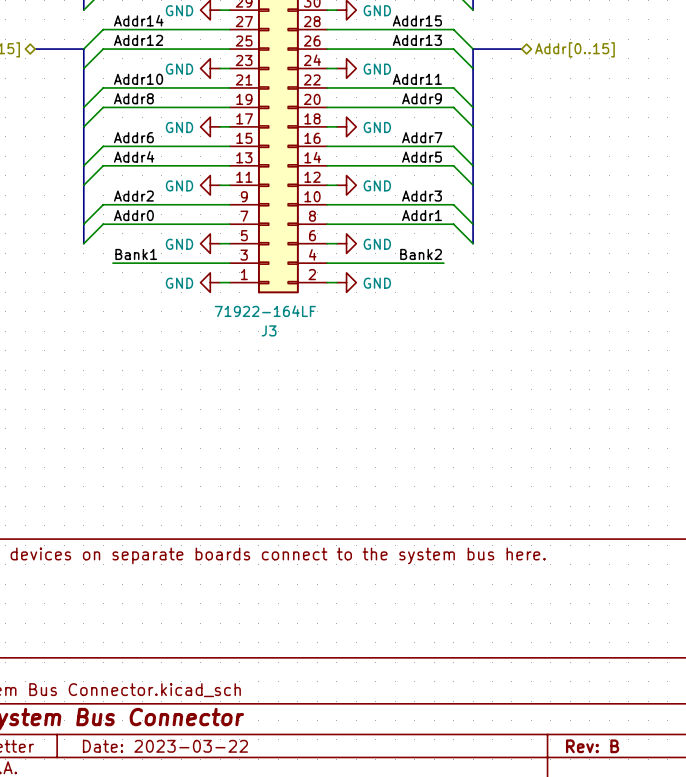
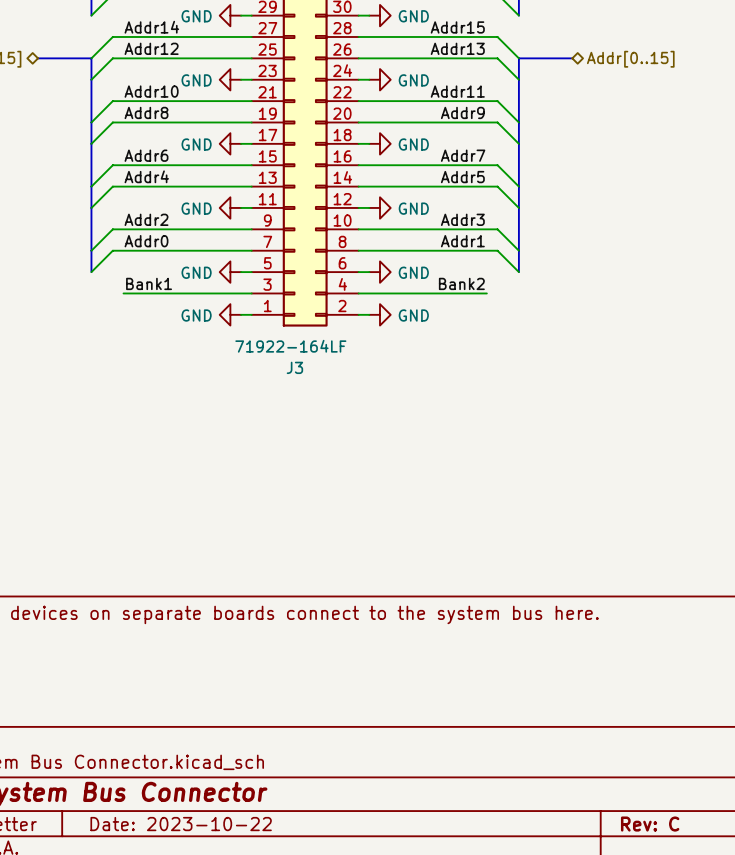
title block: Date: 2023-03-22 (165, 746) -> Date: 2023-10-22 (181, 824)
title block: Rev: B (592, 746) -> Rev: C (650, 824)

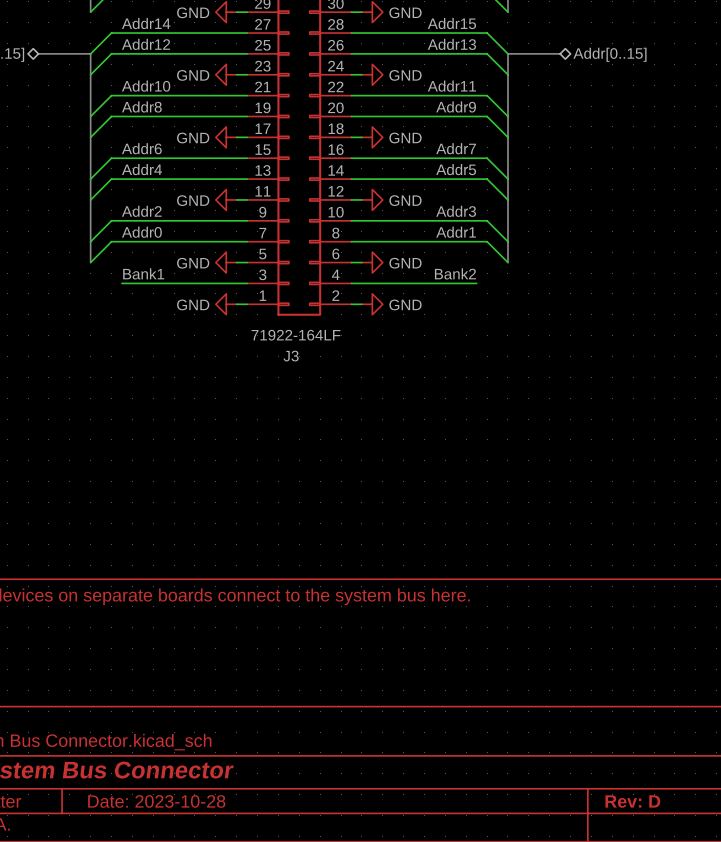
title block: Date: 2023-10-22 (181, 824) -> Date: 2023-10-28 (156, 801)
title block: Rev: C (650, 824) -> Rev: D (632, 801)

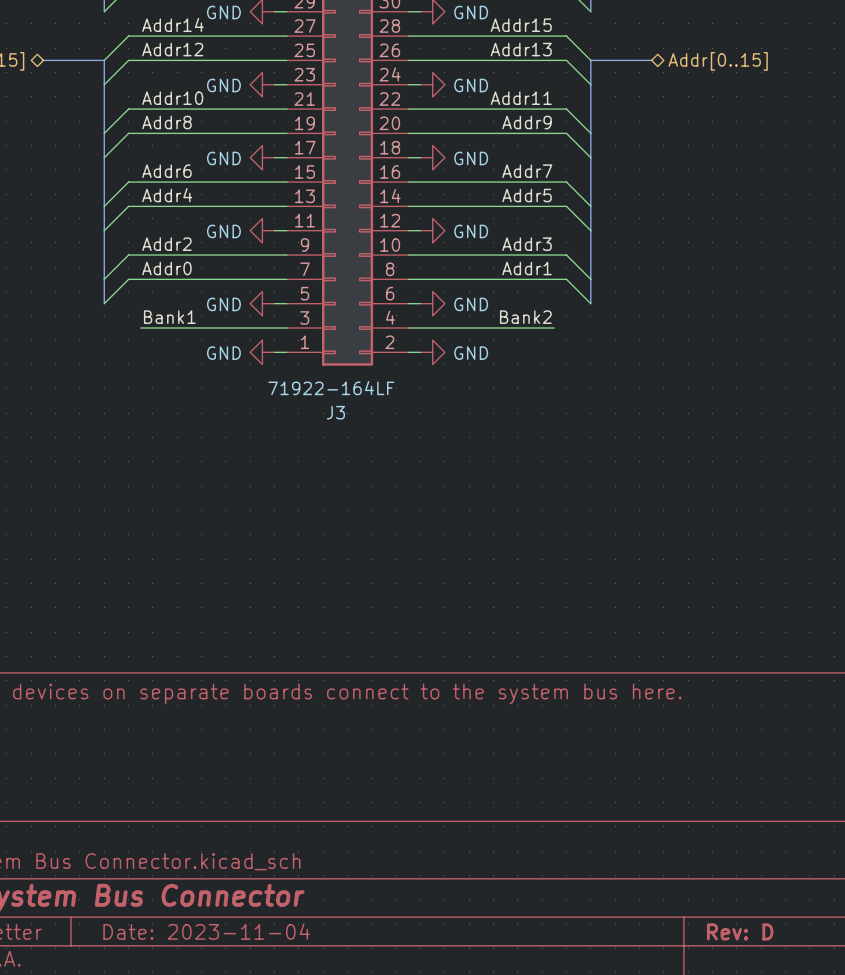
title block: Date: 2023-10-28 (156, 801) -> Date: 2023-11-04 (206, 931)

